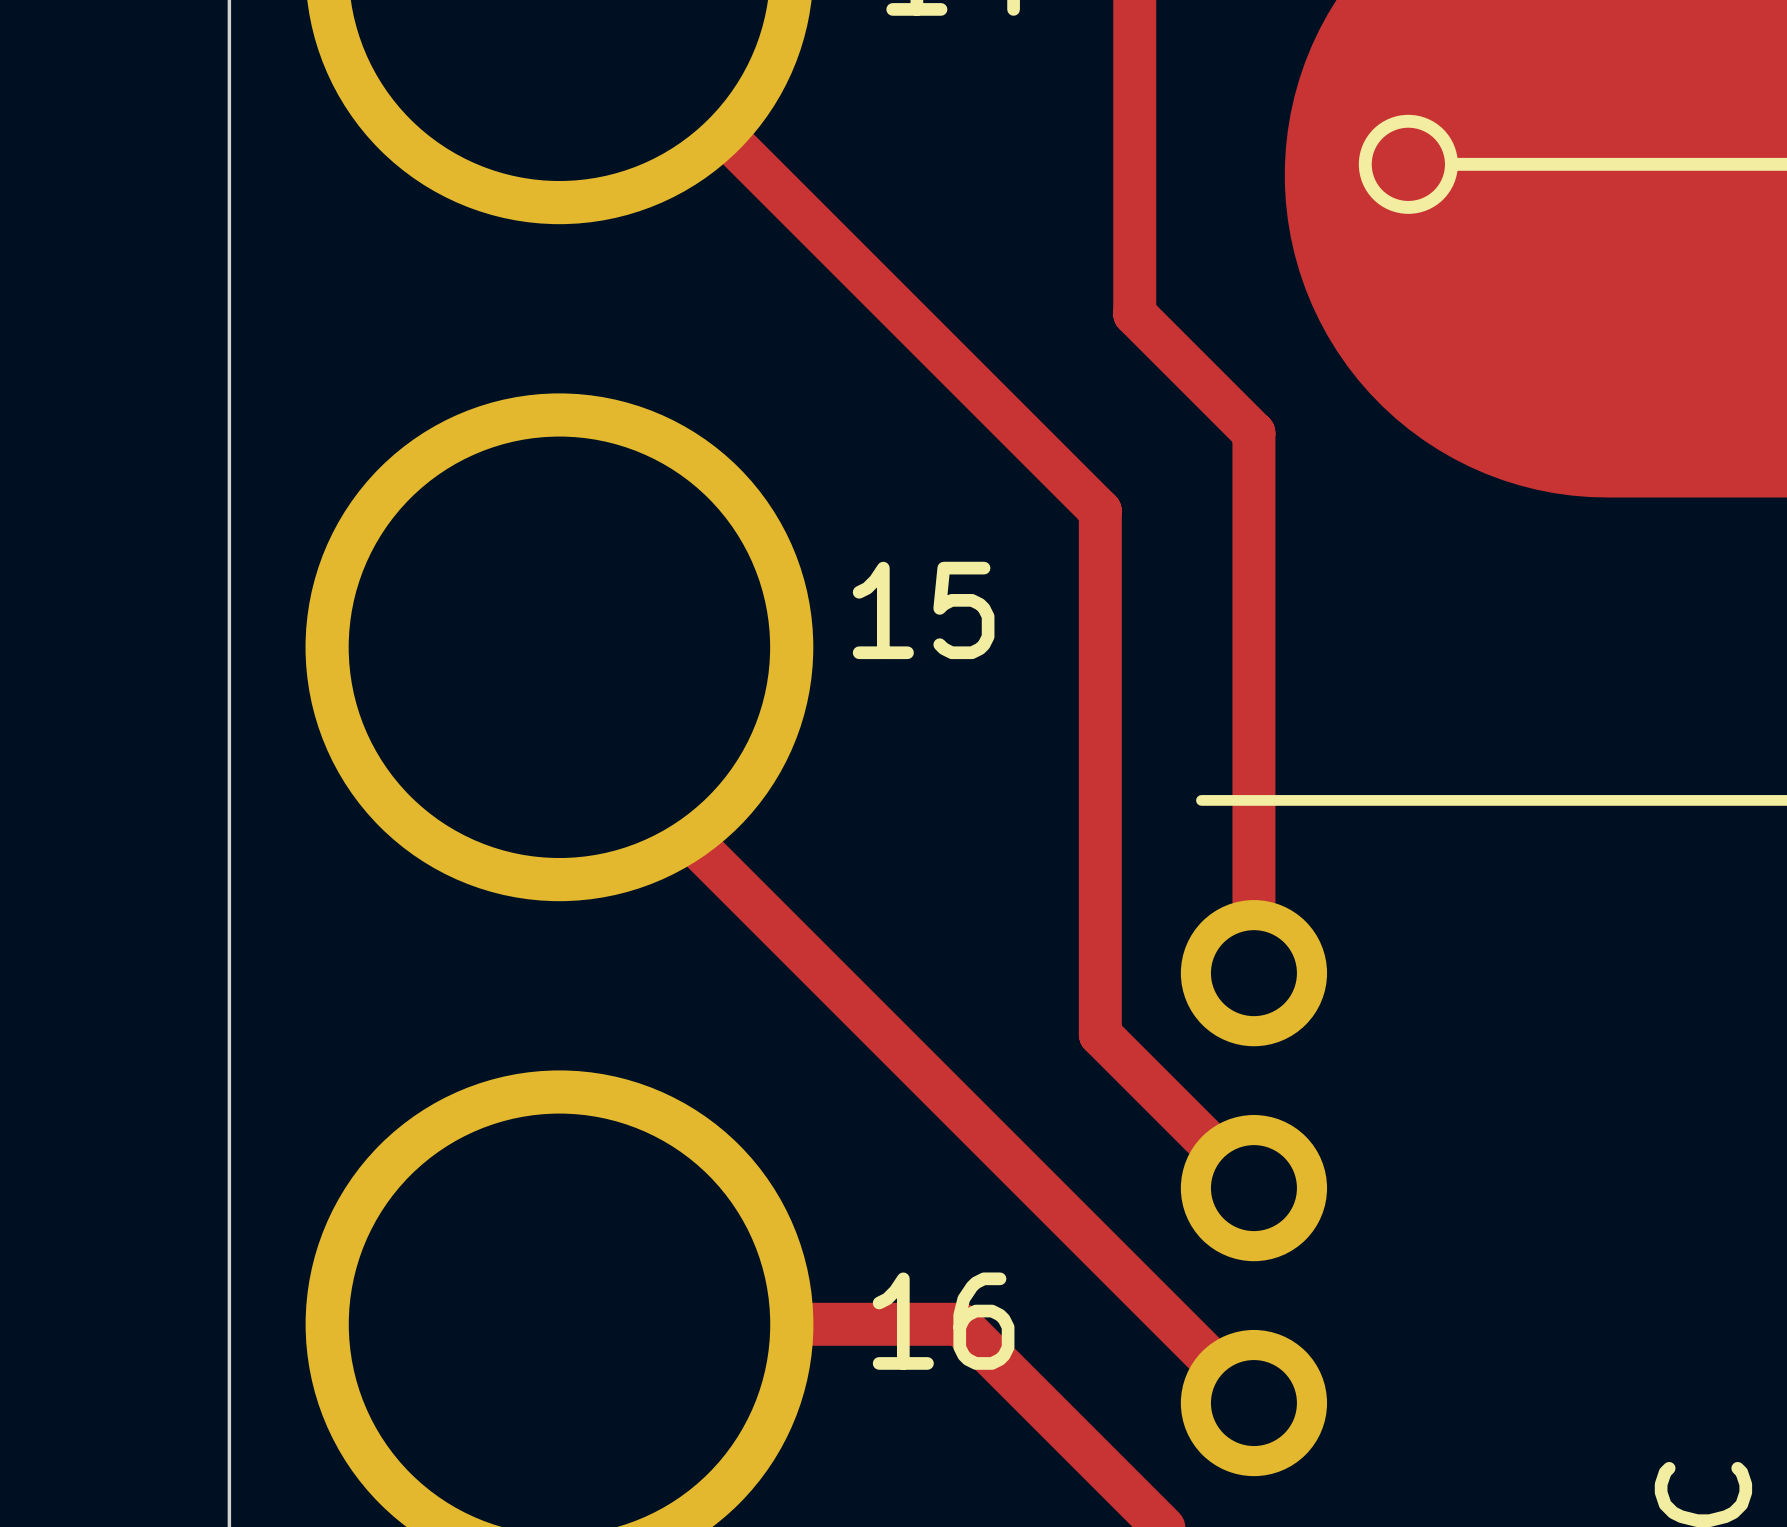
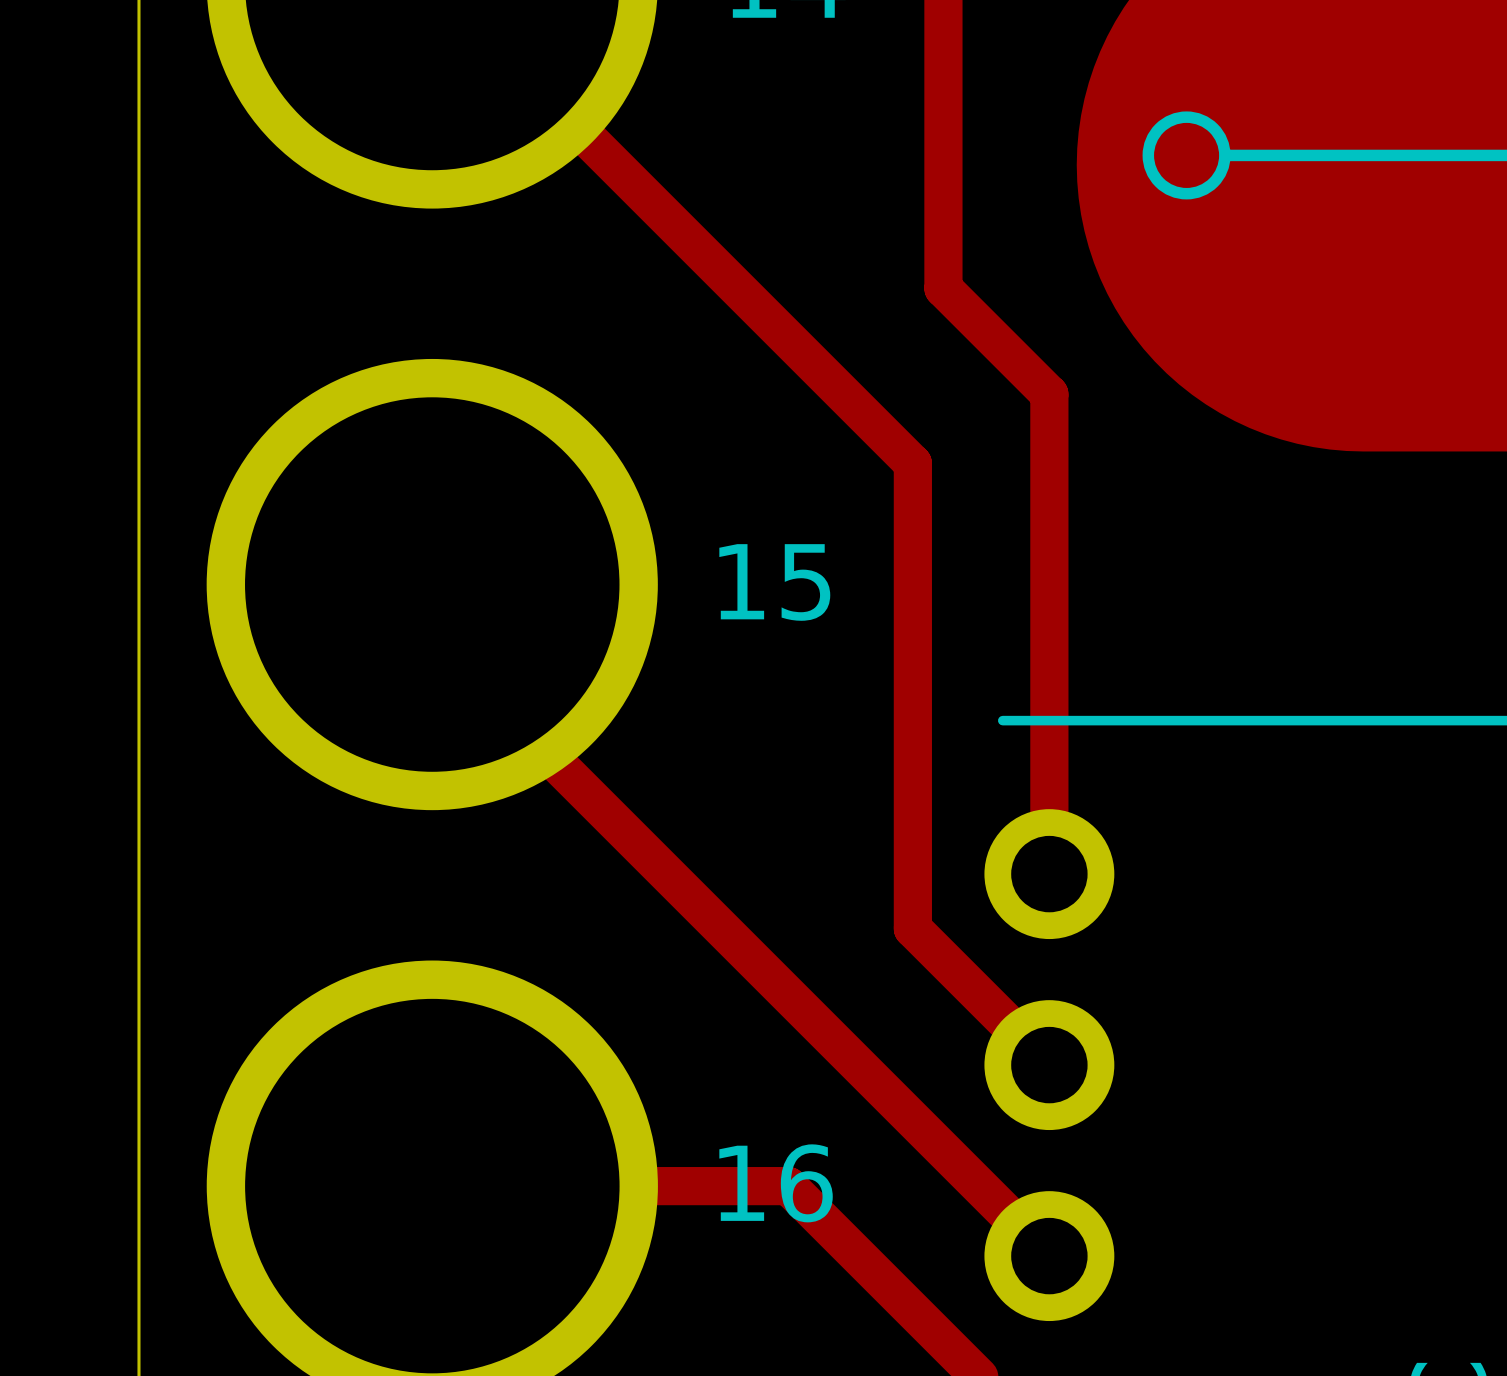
part text position: 15 (923, 610) -> 15 (774, 582)

